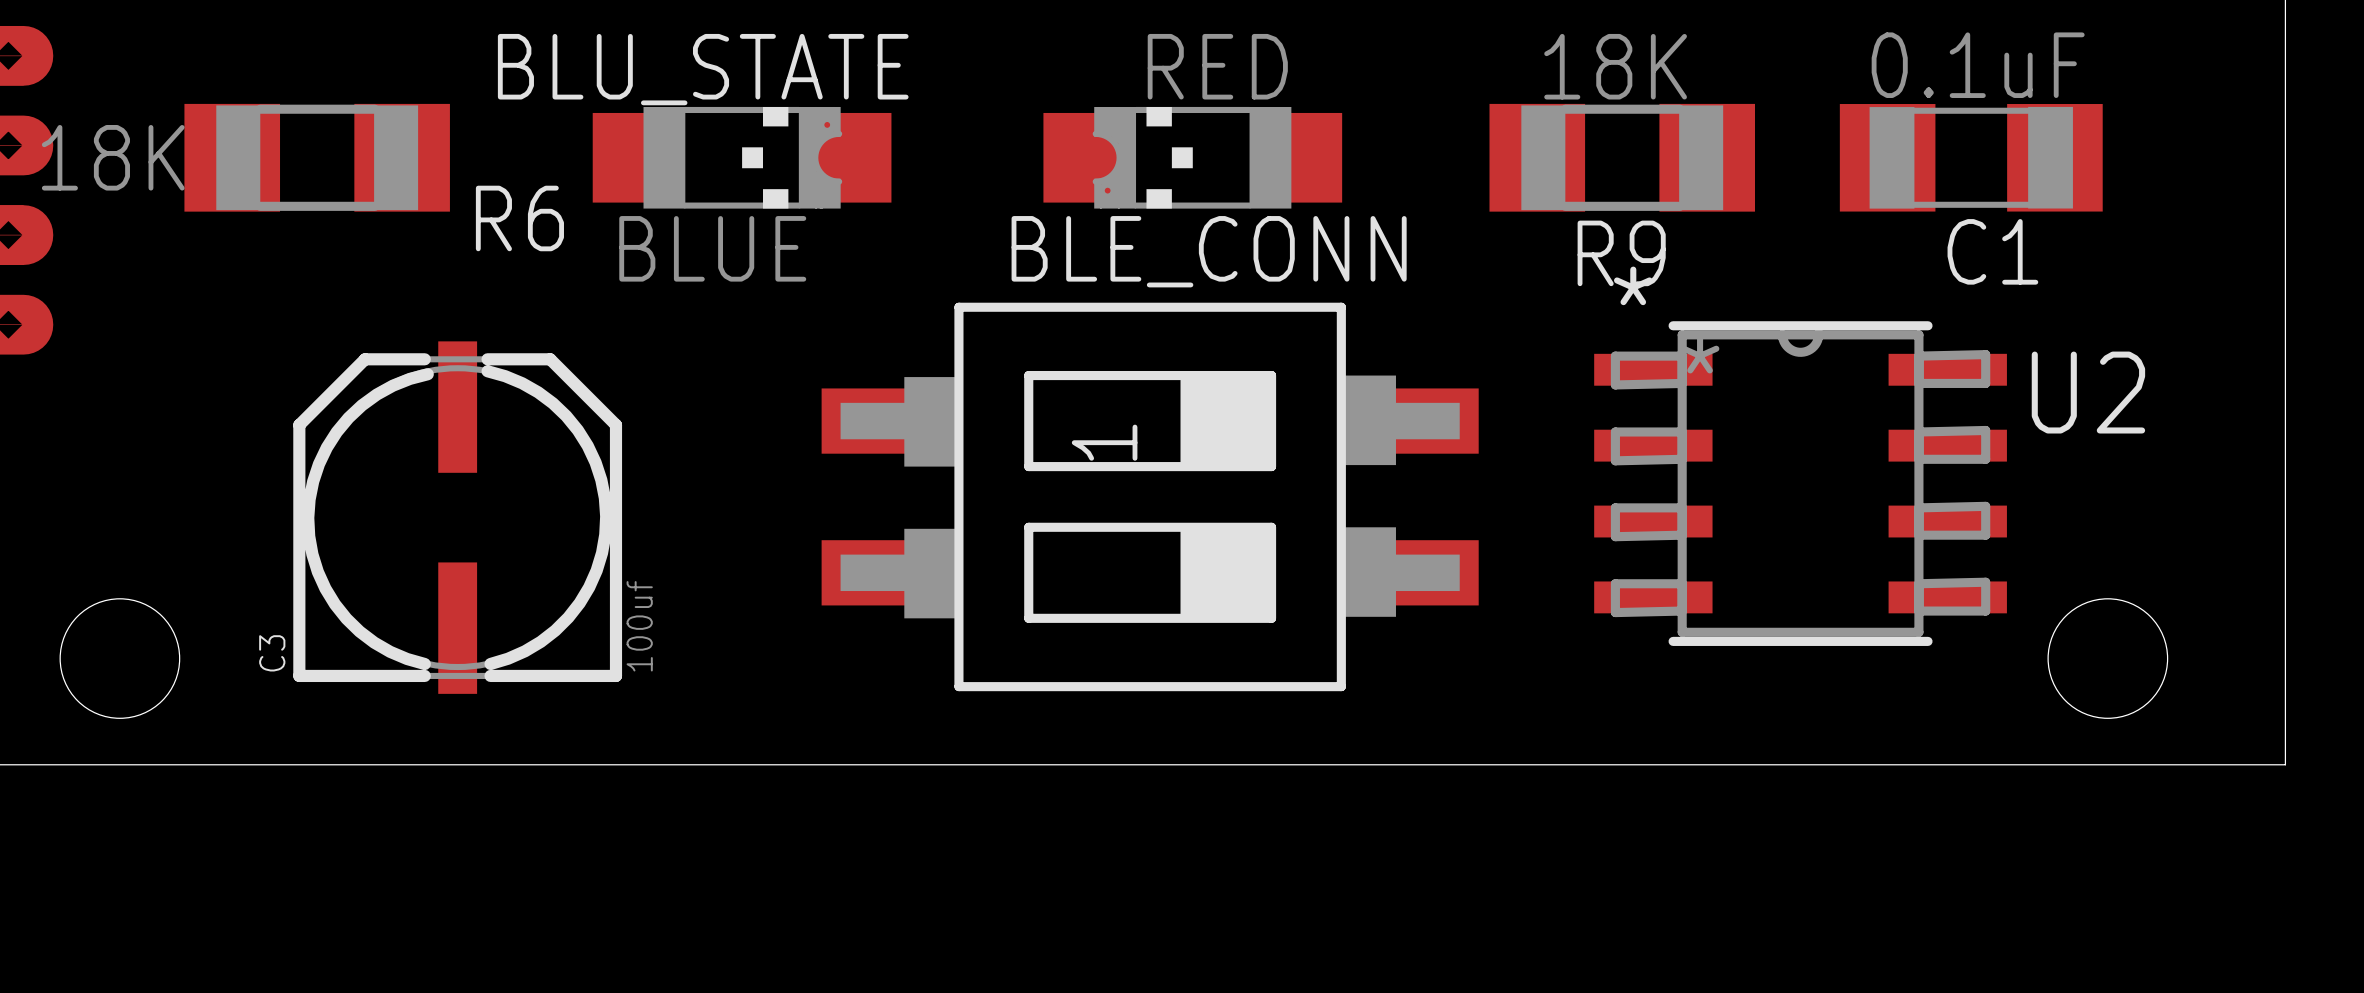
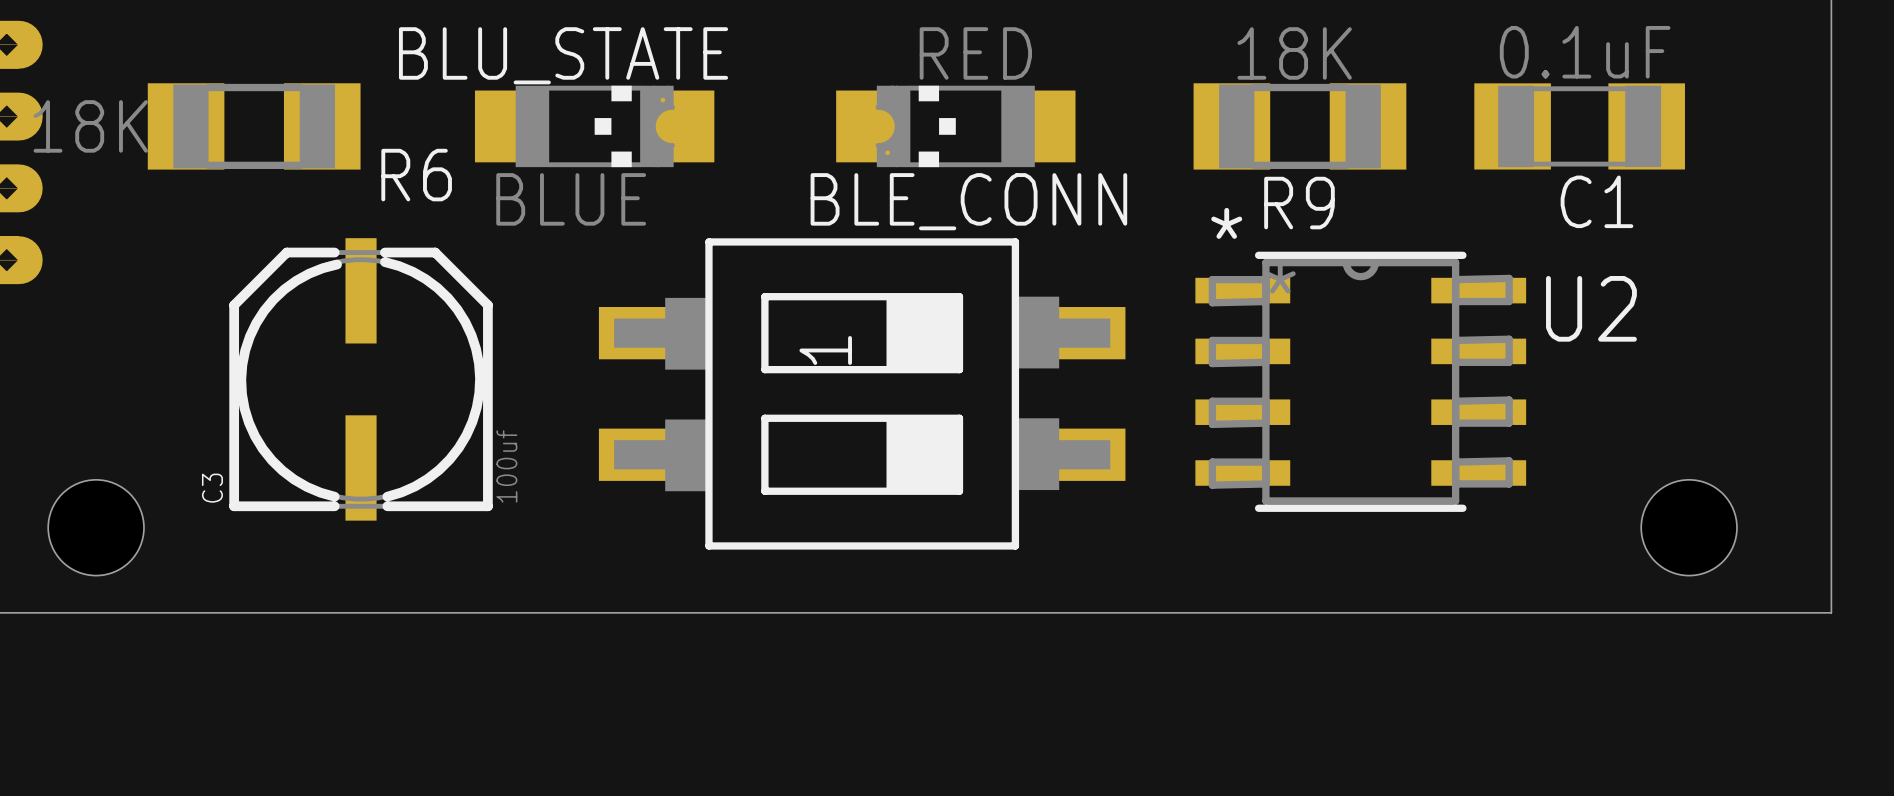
U2 position: (1800, 483) -> (1360, 381)
part position: (1150, 496) -> (862, 393)
C3 position: (457, 517) -> (361, 379)

